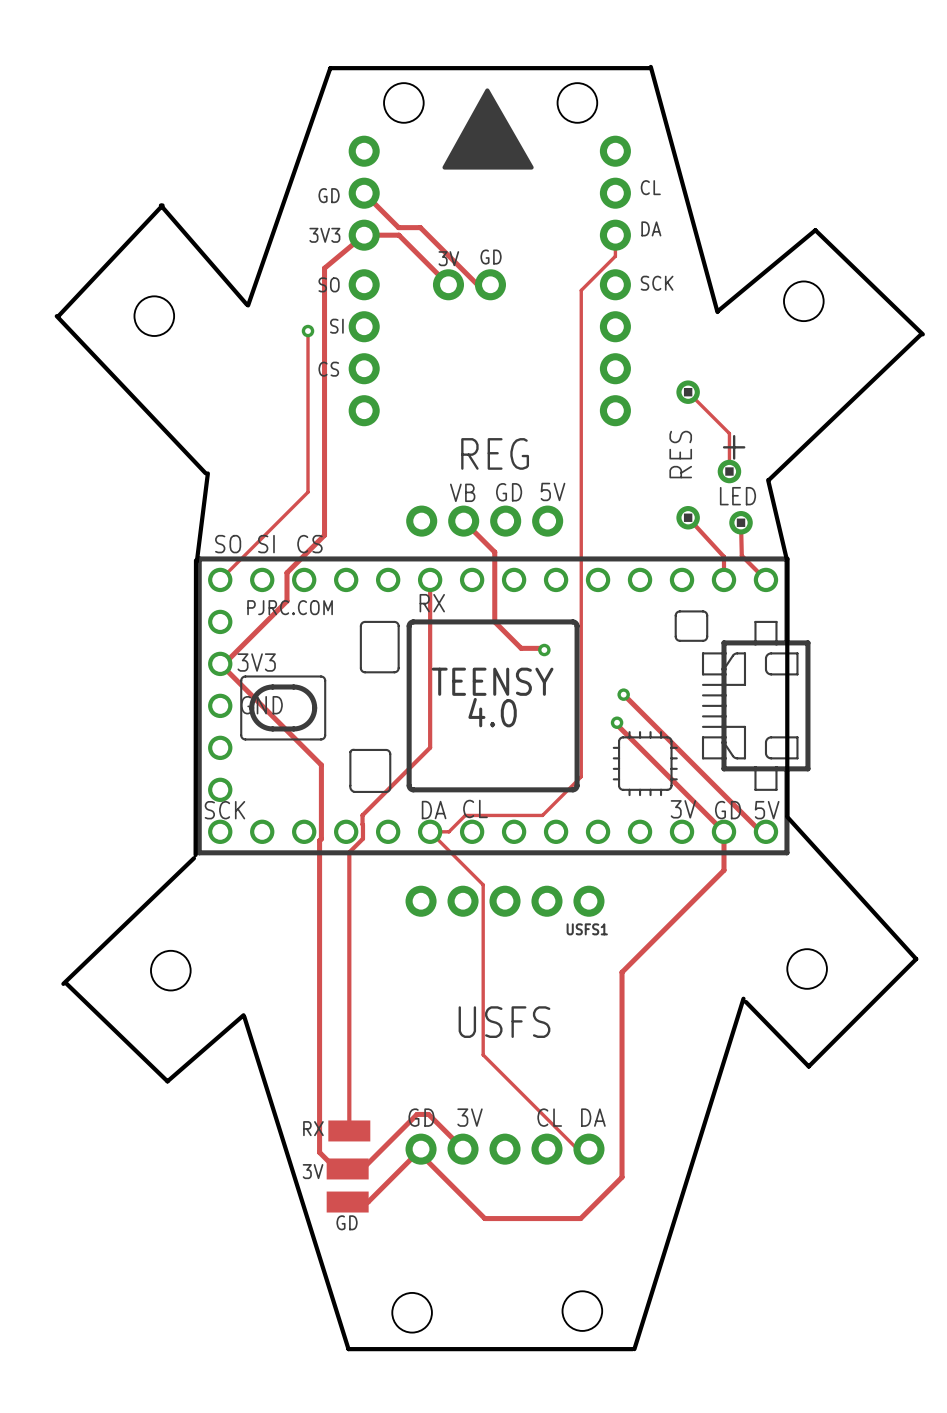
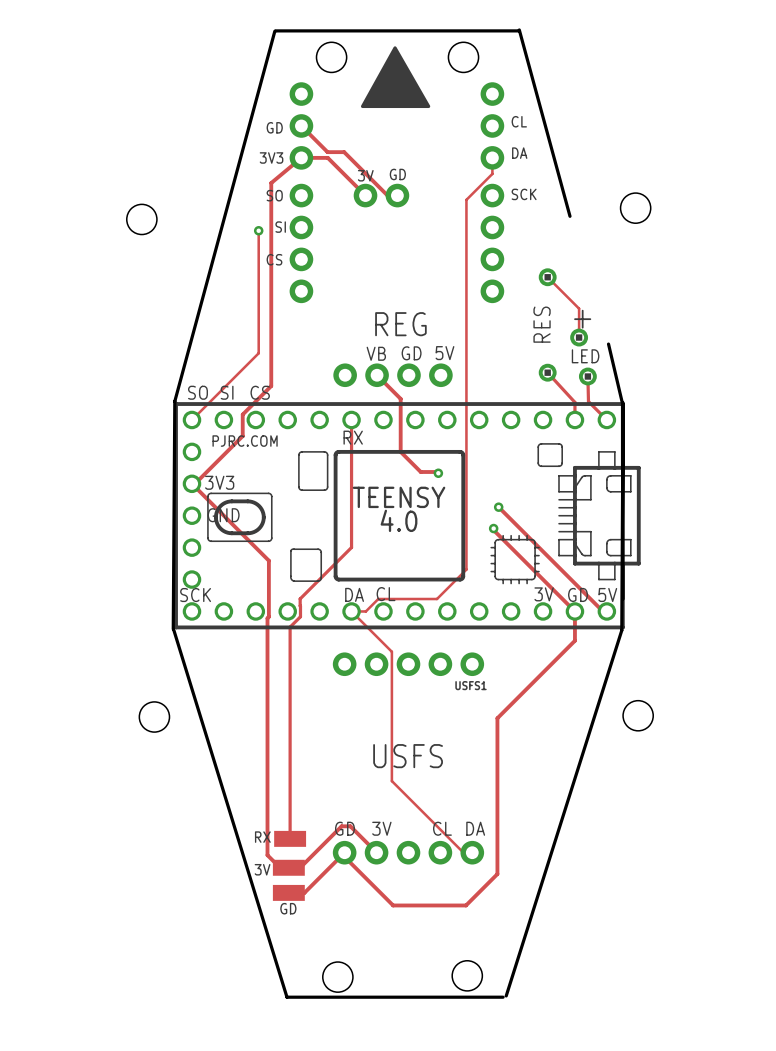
board edge: (330, 68) (248, 305) -> none
board edge: (160, 205) (246, 304) -> none
board edge: (162, 205) (58, 316) -> none
board edge: (717, 311) (815, 230) (922, 334) -> none
board edge: (56, 316) (205, 473) -> none
board edge: (921, 334) (769, 479) -> none
board edge: (207, 473) (196, 561) -> none
board edge: none -> (623, 402) (621, 630) (506, 995)
board edge: (196, 560) (195, 854) -> (274, 31) (174, 401) (173, 629)
board edge: (787, 816) (916, 959) (808, 1066) (745, 1002) -> none
board edge: none -> (173, 630) (286, 997) (503, 997)
board edge: (193, 858) (63, 983) -> none
board edge: (66, 983) (167, 1081) (243, 1015) -> none
board edge: (743, 998) (634, 1349) -> none
board edge: (244, 1016) (348, 1349) (632, 1349) -> none

